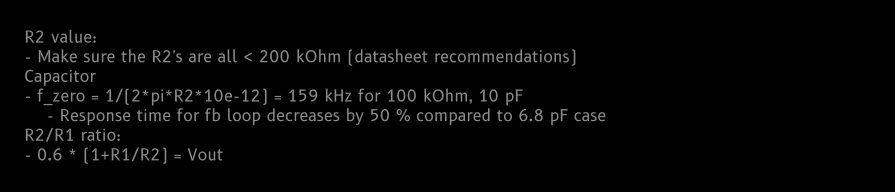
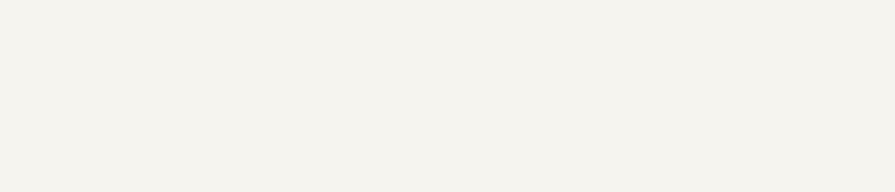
text: R2 value: (60, 36) -> none
text: - Make sure the R2's are all < 200 kOhm (datasheet recommendations) (300, 57) -> none
text: Capacitor (60, 77) -> none
text: - f_zero = 1/(2*pi*R2*10e-12) = 159 kHz for 100 kOhm, 10 pF (274, 97) -> none
text: - Response time for fb loop decreases by 50 % compared to 6.8 pF case (326, 116) -> none
text: R2/R1 ratio: (72, 134) -> none
text: - 0.6 * (1+R1/R2) = Vout (124, 155) -> none

